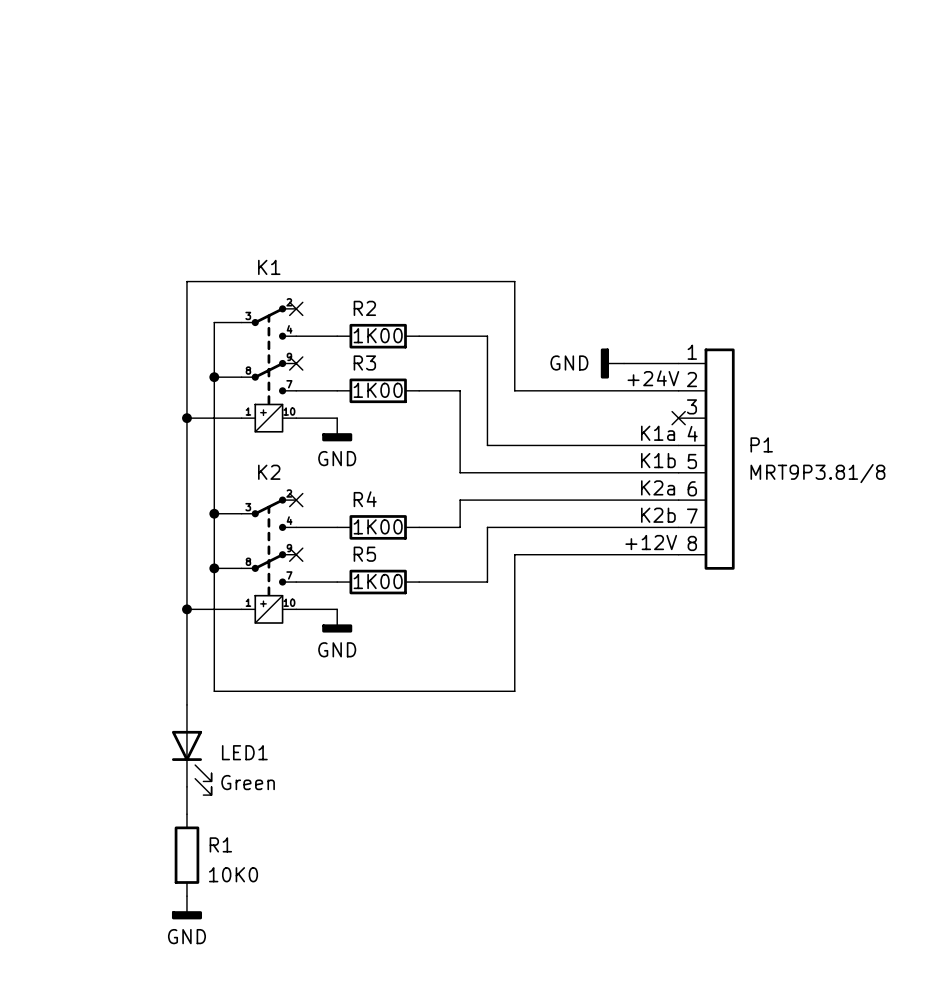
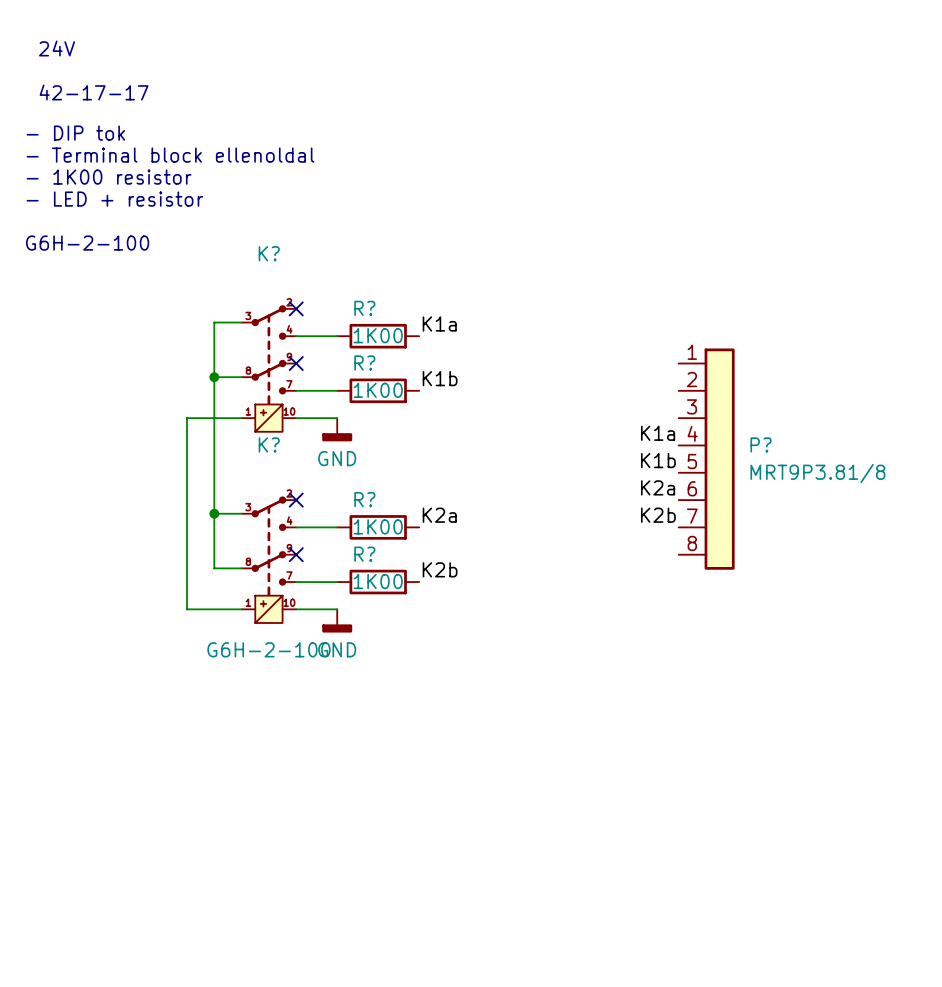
text: none -> 24V (57, 48)
text: none -> 42-17-17 (94, 92)
text: none -> - DIP tok (75, 133)
text: none -> - Terminal block ellenoldal (170, 155)
text: none -> - 1K00 resistor (109, 177)
text: none -> - LED + resistor (114, 199)
text: none -> G6H-2-100 (87, 243)
K1 name: K1 (269, 267) -> K? (269, 253)
R2 name: R2 (364, 308) -> R? (364, 308)
label: none -> K1a (439, 324)
wire: (419, 336) (487, 336) (487, 445) (678, 445) -> none
R3 name: R3 (364, 363) -> R? (364, 363)
power symbol: GND (612, 363) -> none
wire: (624, 363) (678, 363) -> none
label: none -> K1b (440, 378)
label: +24V (653, 378) -> none
wire: (419, 390) (460, 390) (460, 472) (678, 472) -> none
wire: (678, 390) (514, 390) (514, 281) (186, 281) (186, 418) -> none
junction: (186, 418) -> none
no-connect mark: (678, 418) -> none
P1 name: P1 (761, 444) -> P? (761, 444)
K2 name: K2 (269, 472) -> K? (269, 444)
R4 name: R4 (365, 499) -> R? (364, 499)
wire: (678, 500) (460, 500) (460, 527) (419, 527) -> none
label: none -> K2a (439, 515)
wire: (678, 527) (487, 527) (487, 582) (419, 582) -> none
label: +12V (651, 542) -> none
R5 name: R5 (364, 554) -> R? (364, 554)
wire: (678, 554) (514, 554) (514, 691) (214, 691) (214, 568) -> none
junction: (214, 568) -> none
label: none -> K2b (440, 569)
wire: (186, 609) (186, 704) -> none
junction: (186, 609) -> none
K2 text: none -> G6H-2-100 (268, 649)
LED1: (191, 750) -> none
wire: (186, 786) (186, 814) -> none
R1: (186, 855) -> none
power symbol: GND (186, 907) -> none

